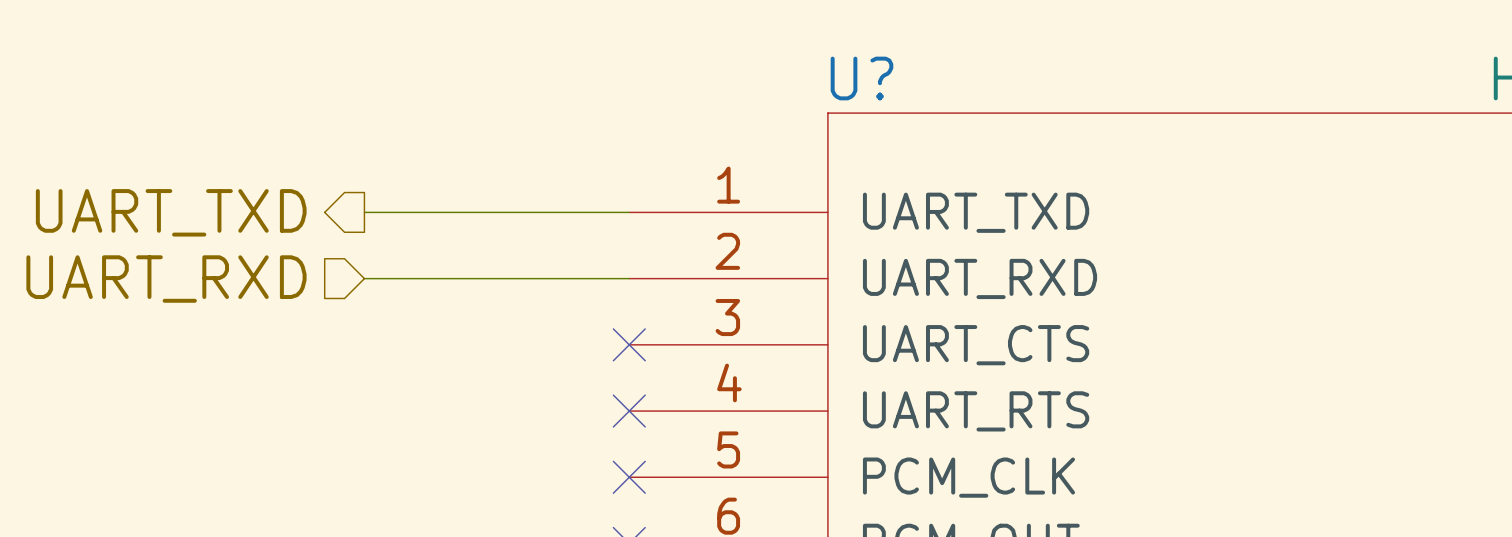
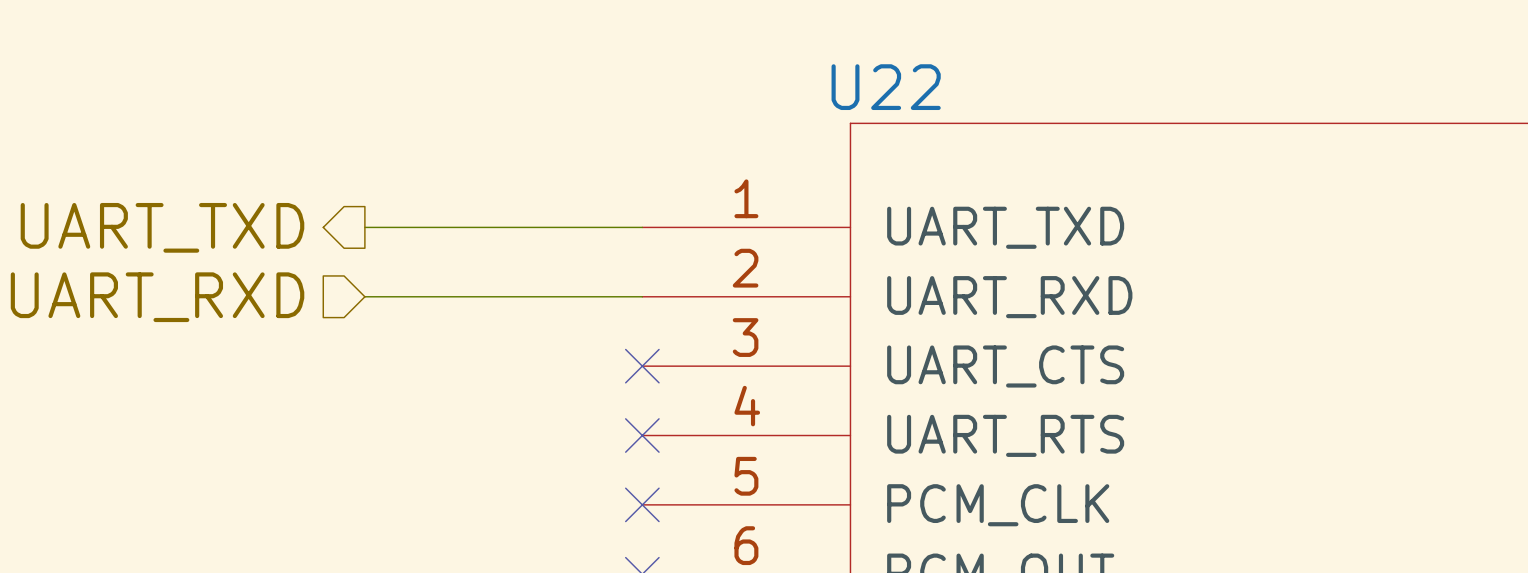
U? name: U? (861, 78) -> U22 (886, 87)

